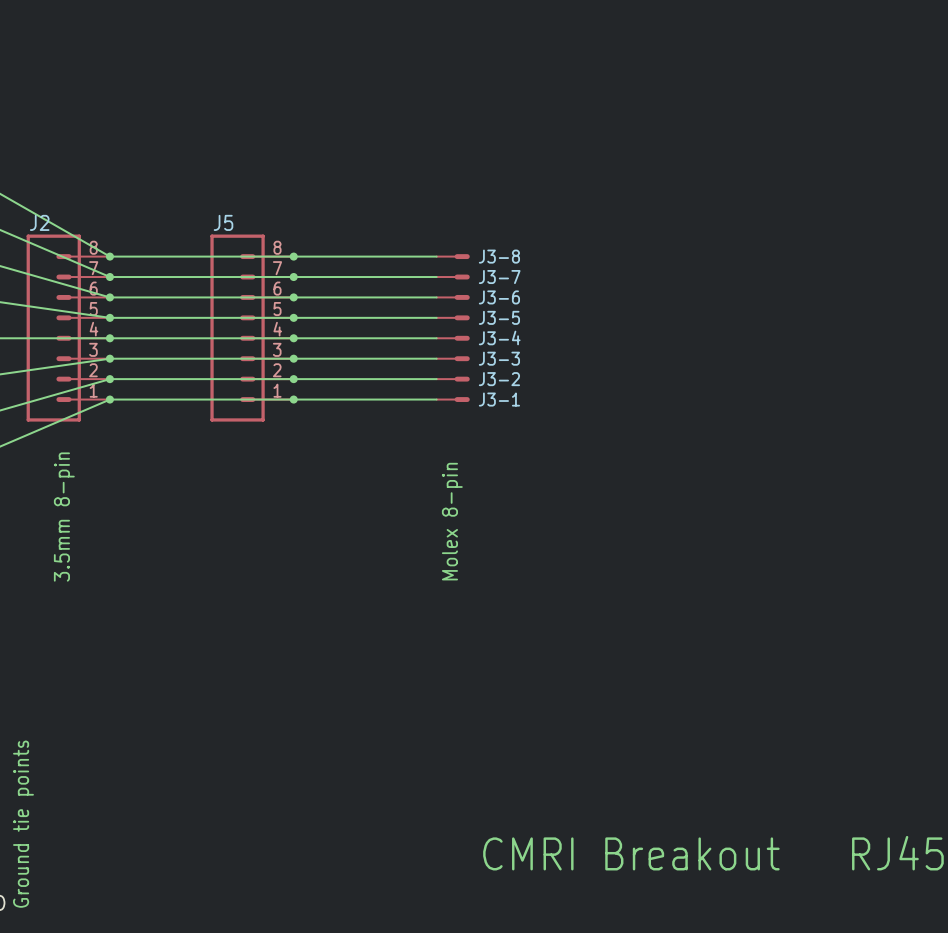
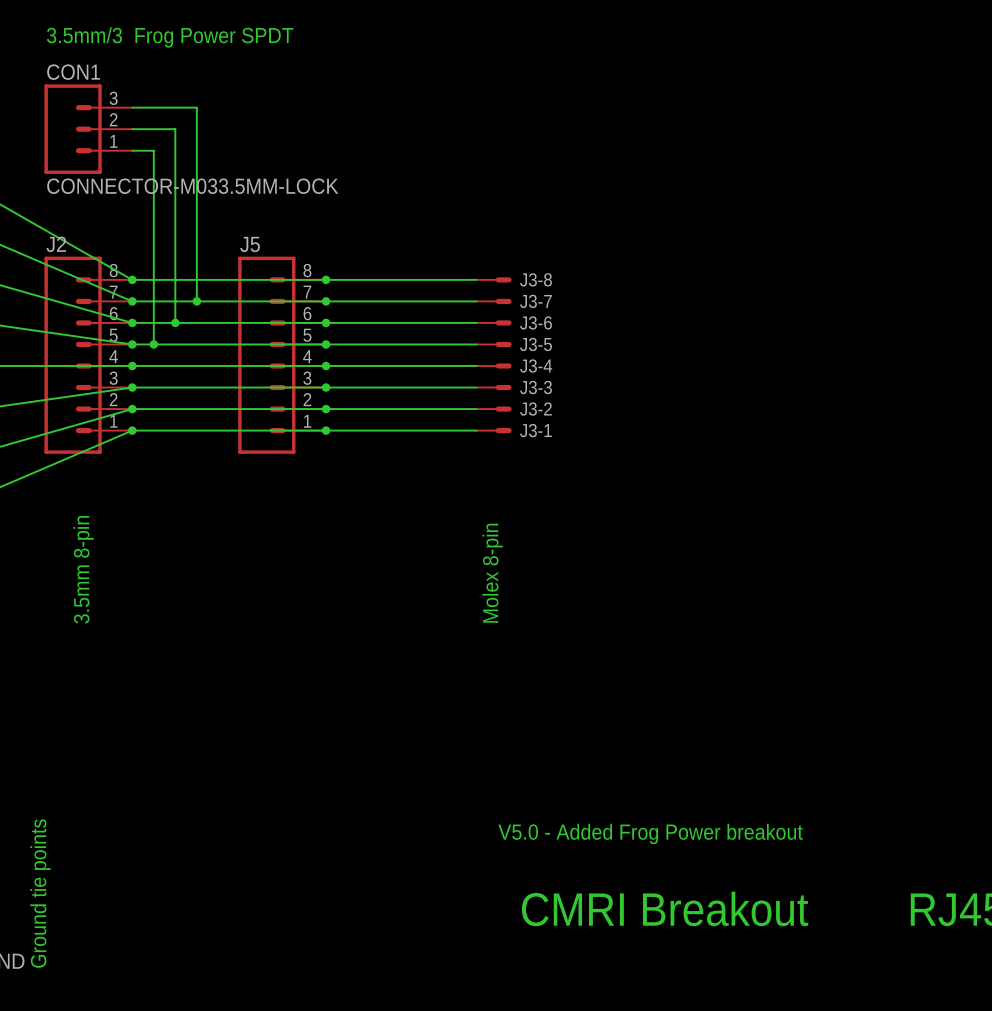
text: none -> 3.5mm/3 Frog Power SPDT (170, 37)
wire: none -> (132, 107) (196, 107) (196, 301)
CON1: none -> CONNECTOR-M033.5MM-LOCK (88, 129)
wire: none -> (132, 129) (175, 129) (175, 322)
wire: none -> (132, 150) (153, 150) (153, 344)
junction: none -> (196, 301)
junction: none -> (175, 322)
junction: none -> (153, 344)
text: none -> V5.0 - Added Frog Power breakout (650, 833)

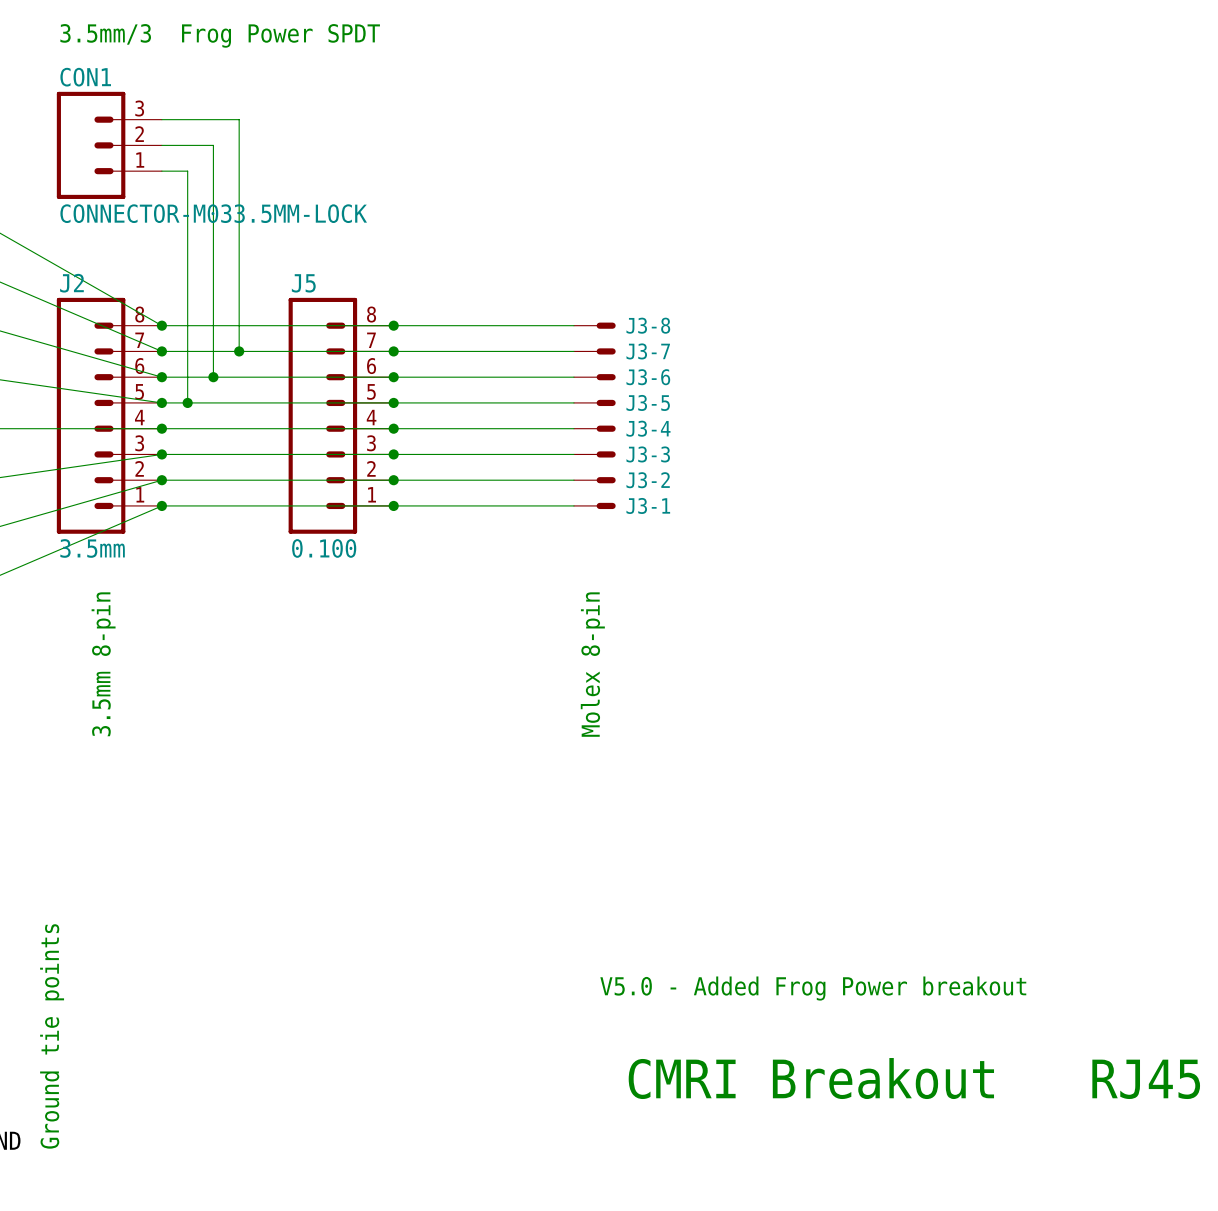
J2 value: none -> 3.5mm (92, 548)
J5 value: none -> 0.100 (324, 548)

